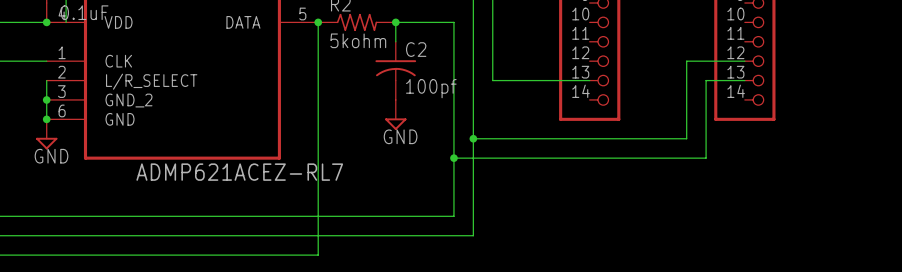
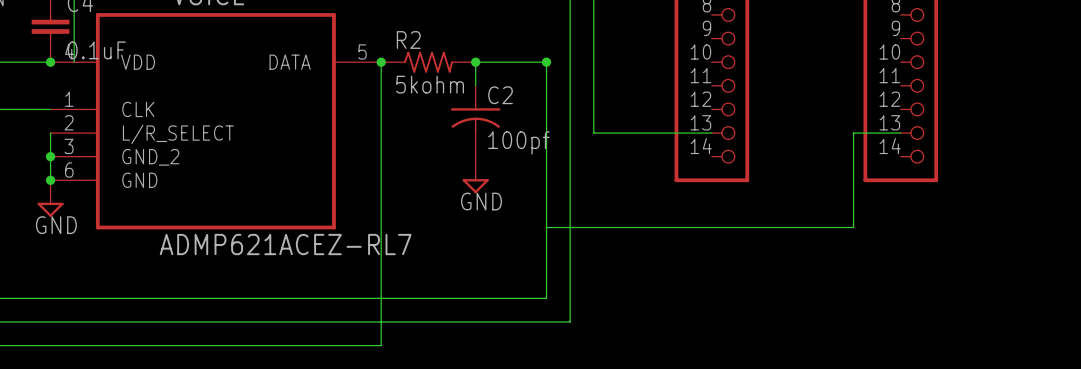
junction: none -> (546, 62)
wire: (744, 61) (686, 61) (686, 138) (473, 138) -> none
junction: (473, 138) -> none
junction: (453, 158) -> none

